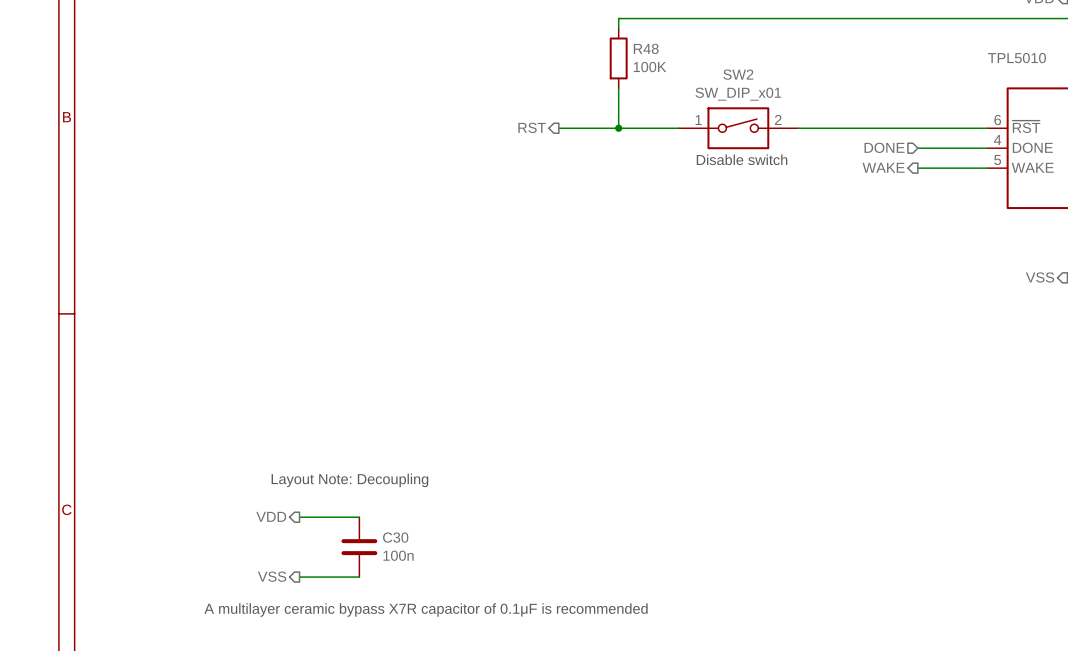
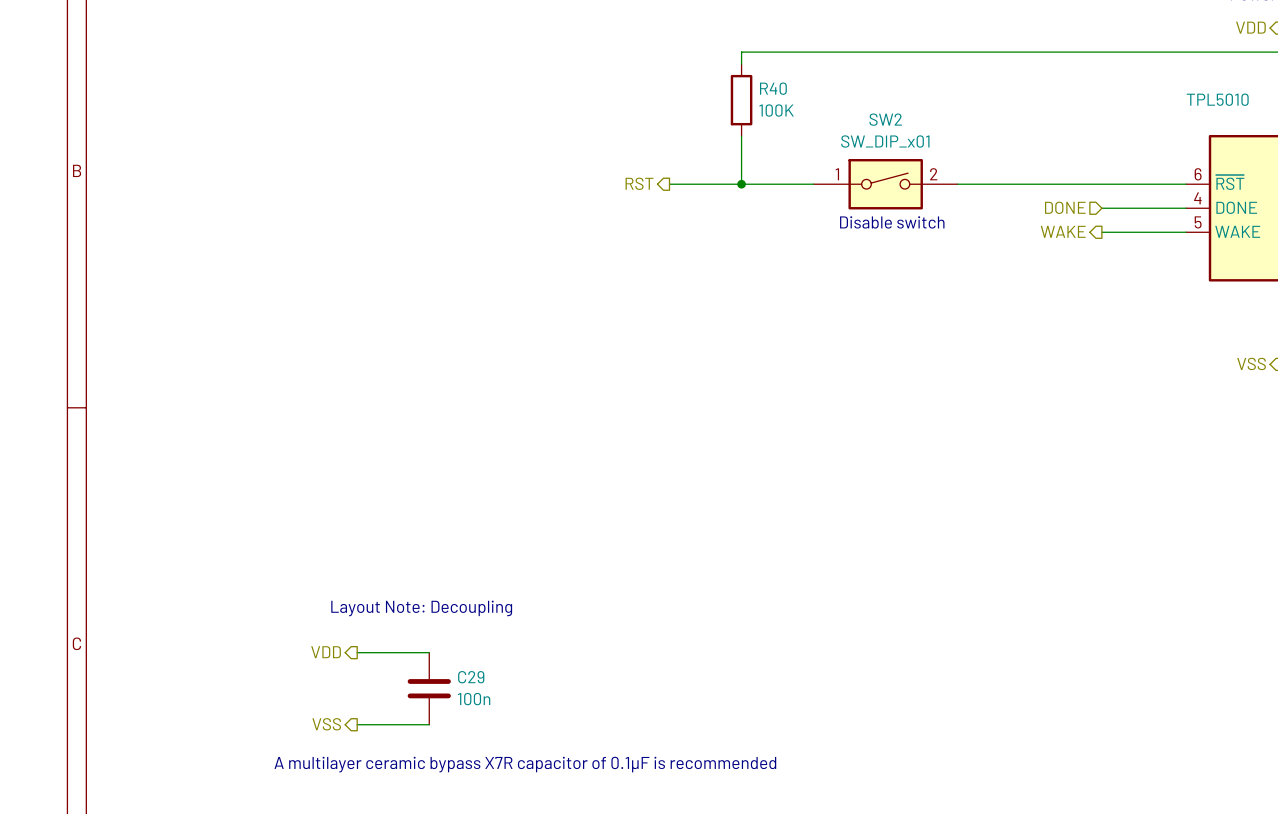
R48 name: R48 (646, 48) -> R40 (773, 88)
C30 name: C30 (395, 537) -> C29 (471, 677)

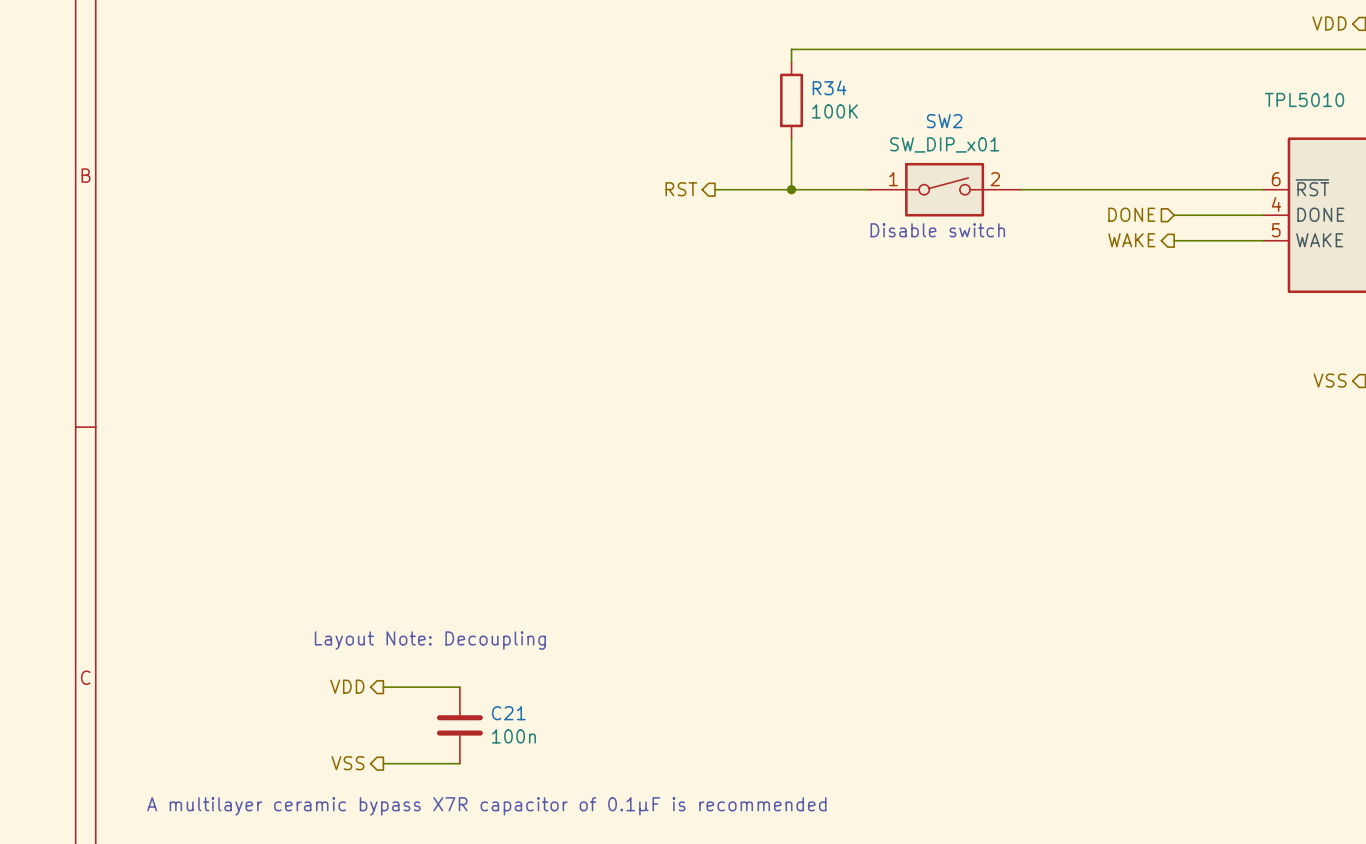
R40 name: R40 (773, 88) -> R34 (829, 87)
C29 name: C29 (471, 677) -> C21 (508, 713)

